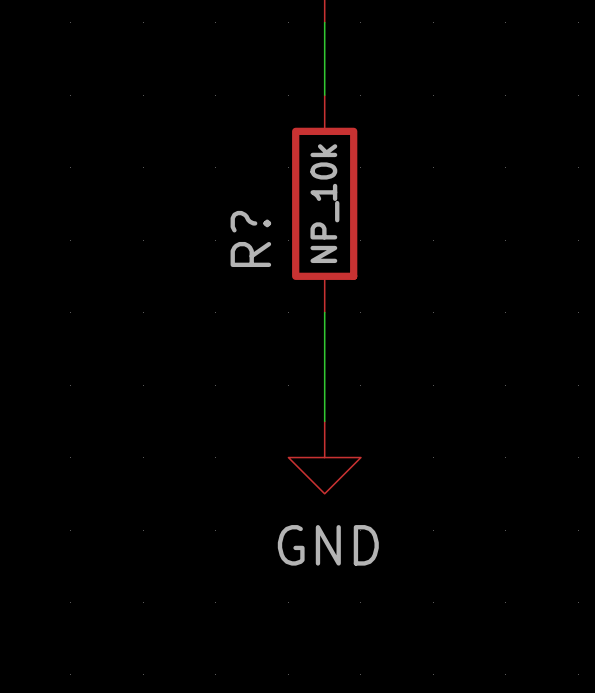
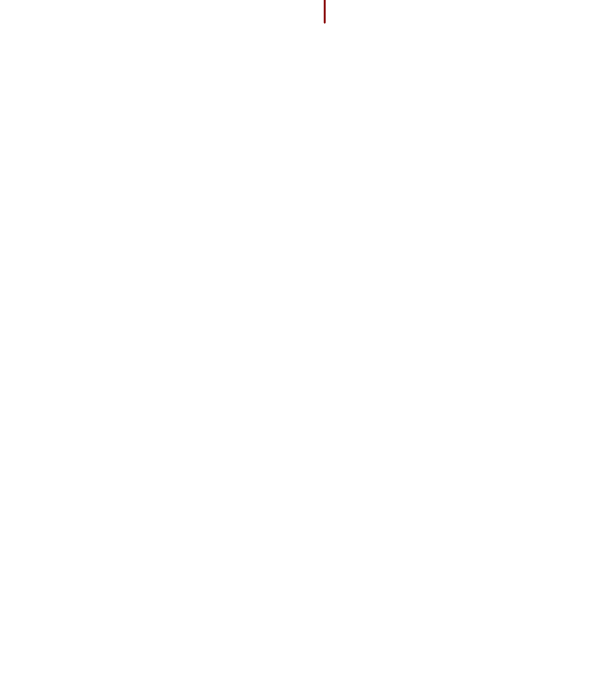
wire: (324, 22) (324, 95) -> none
R?: NP_10k (324, 203) -> none
wire: (324, 312) (324, 421) -> none
power symbol: GND (324, 457) -> none

